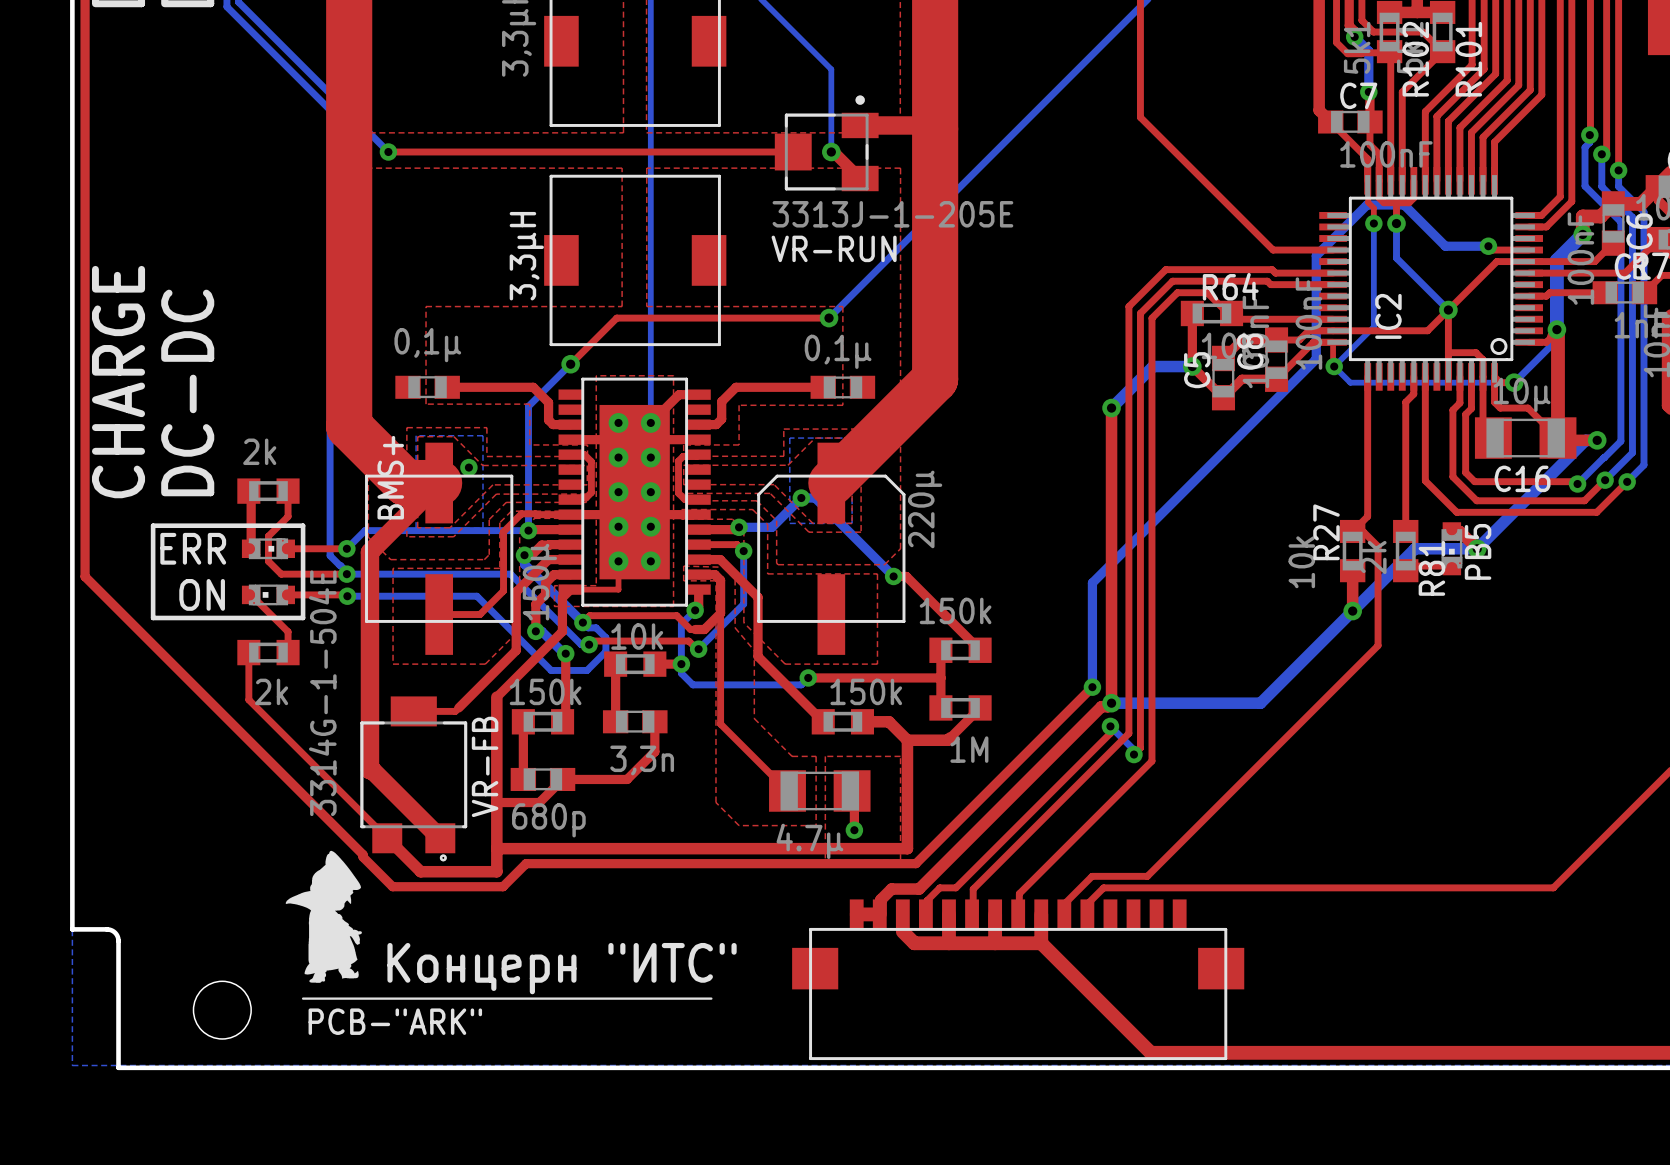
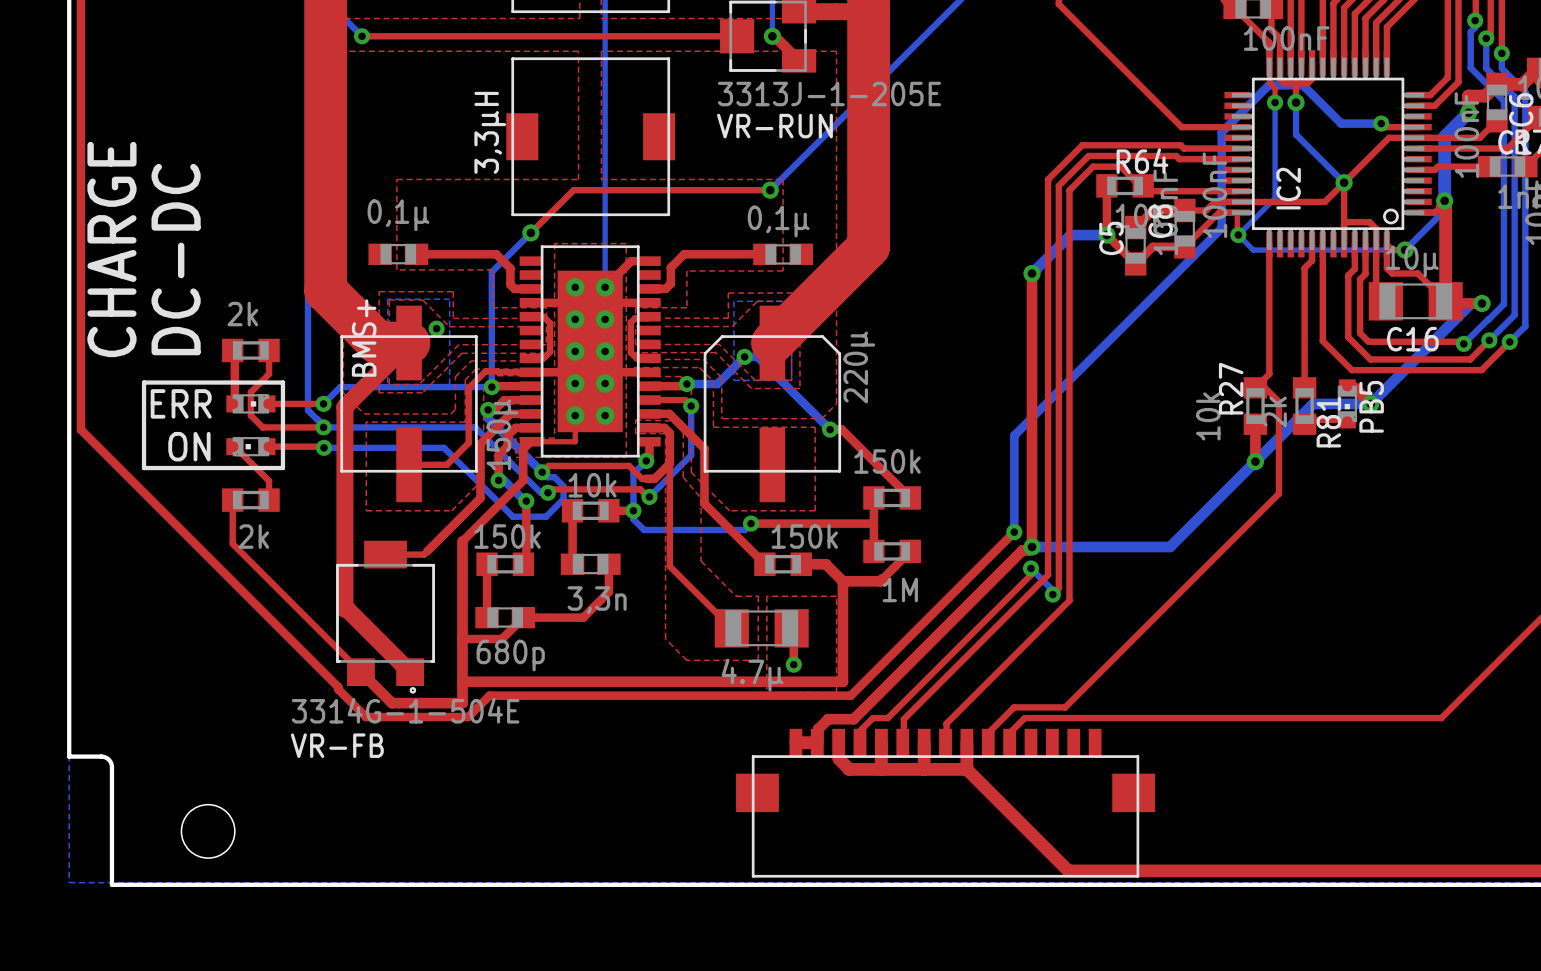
VR-FB value rotation: 0° (322, 693) -> 90° clockwise (405, 710)
VR-FB name rotation: 0° (485, 766) -> 90° clockwise (337, 745)
VR-FB name position: VR-FB (485, 766) -> VR-FB (337, 745)
drawing: [285, 850, 713, 1000] -> none

